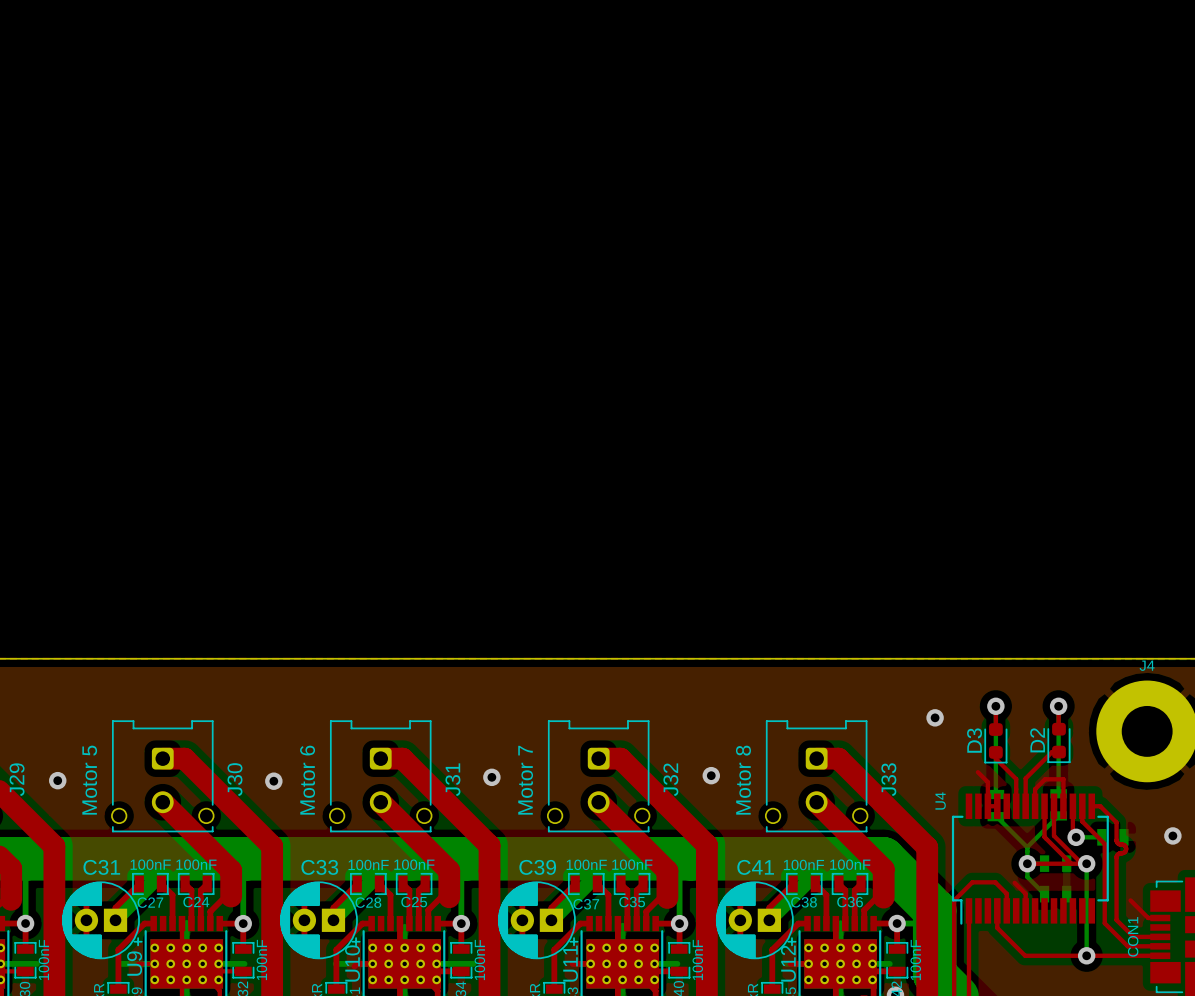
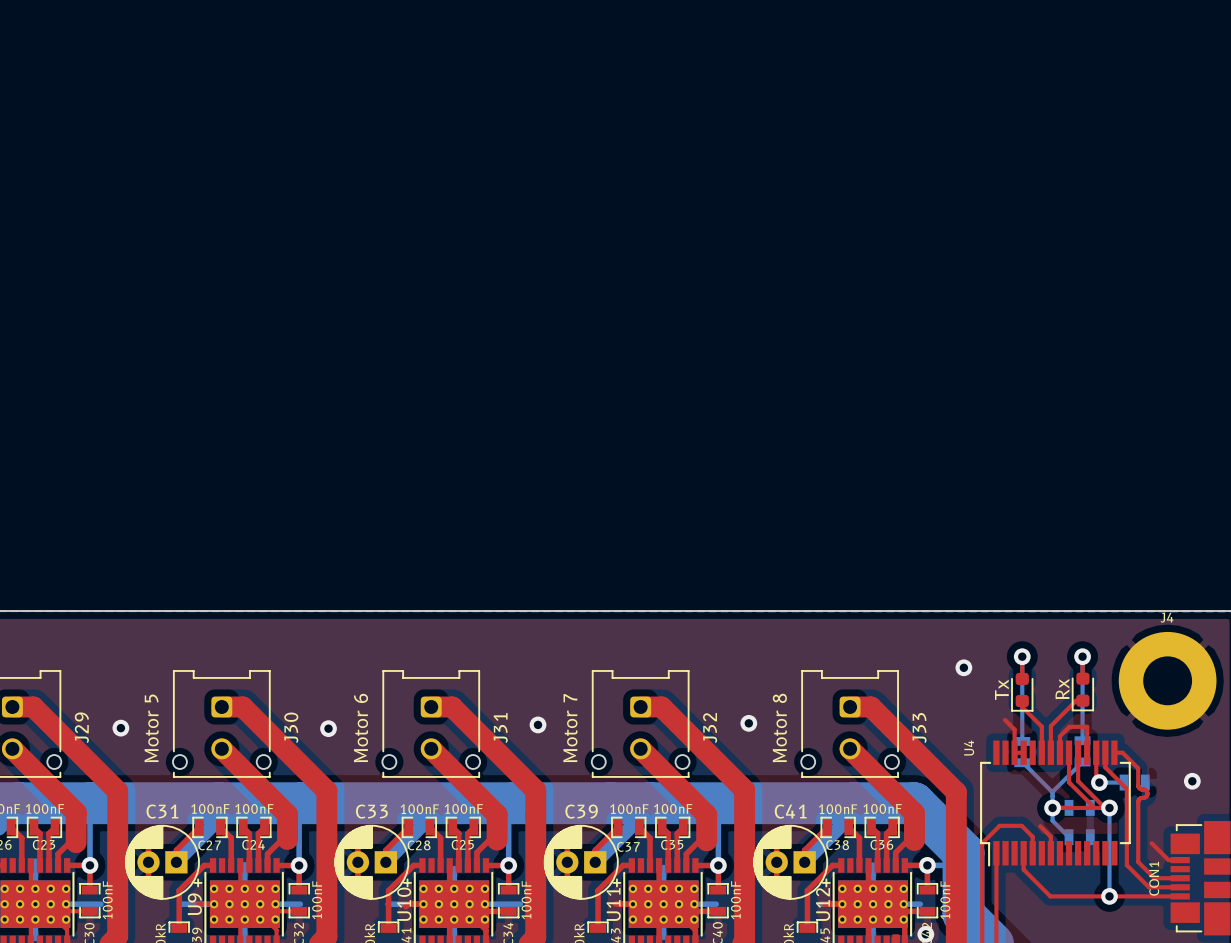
D3 name: D3 (974, 740) -> Tx (1001, 689)
D2 name: D2 (1037, 740) -> Rx (1062, 689)

